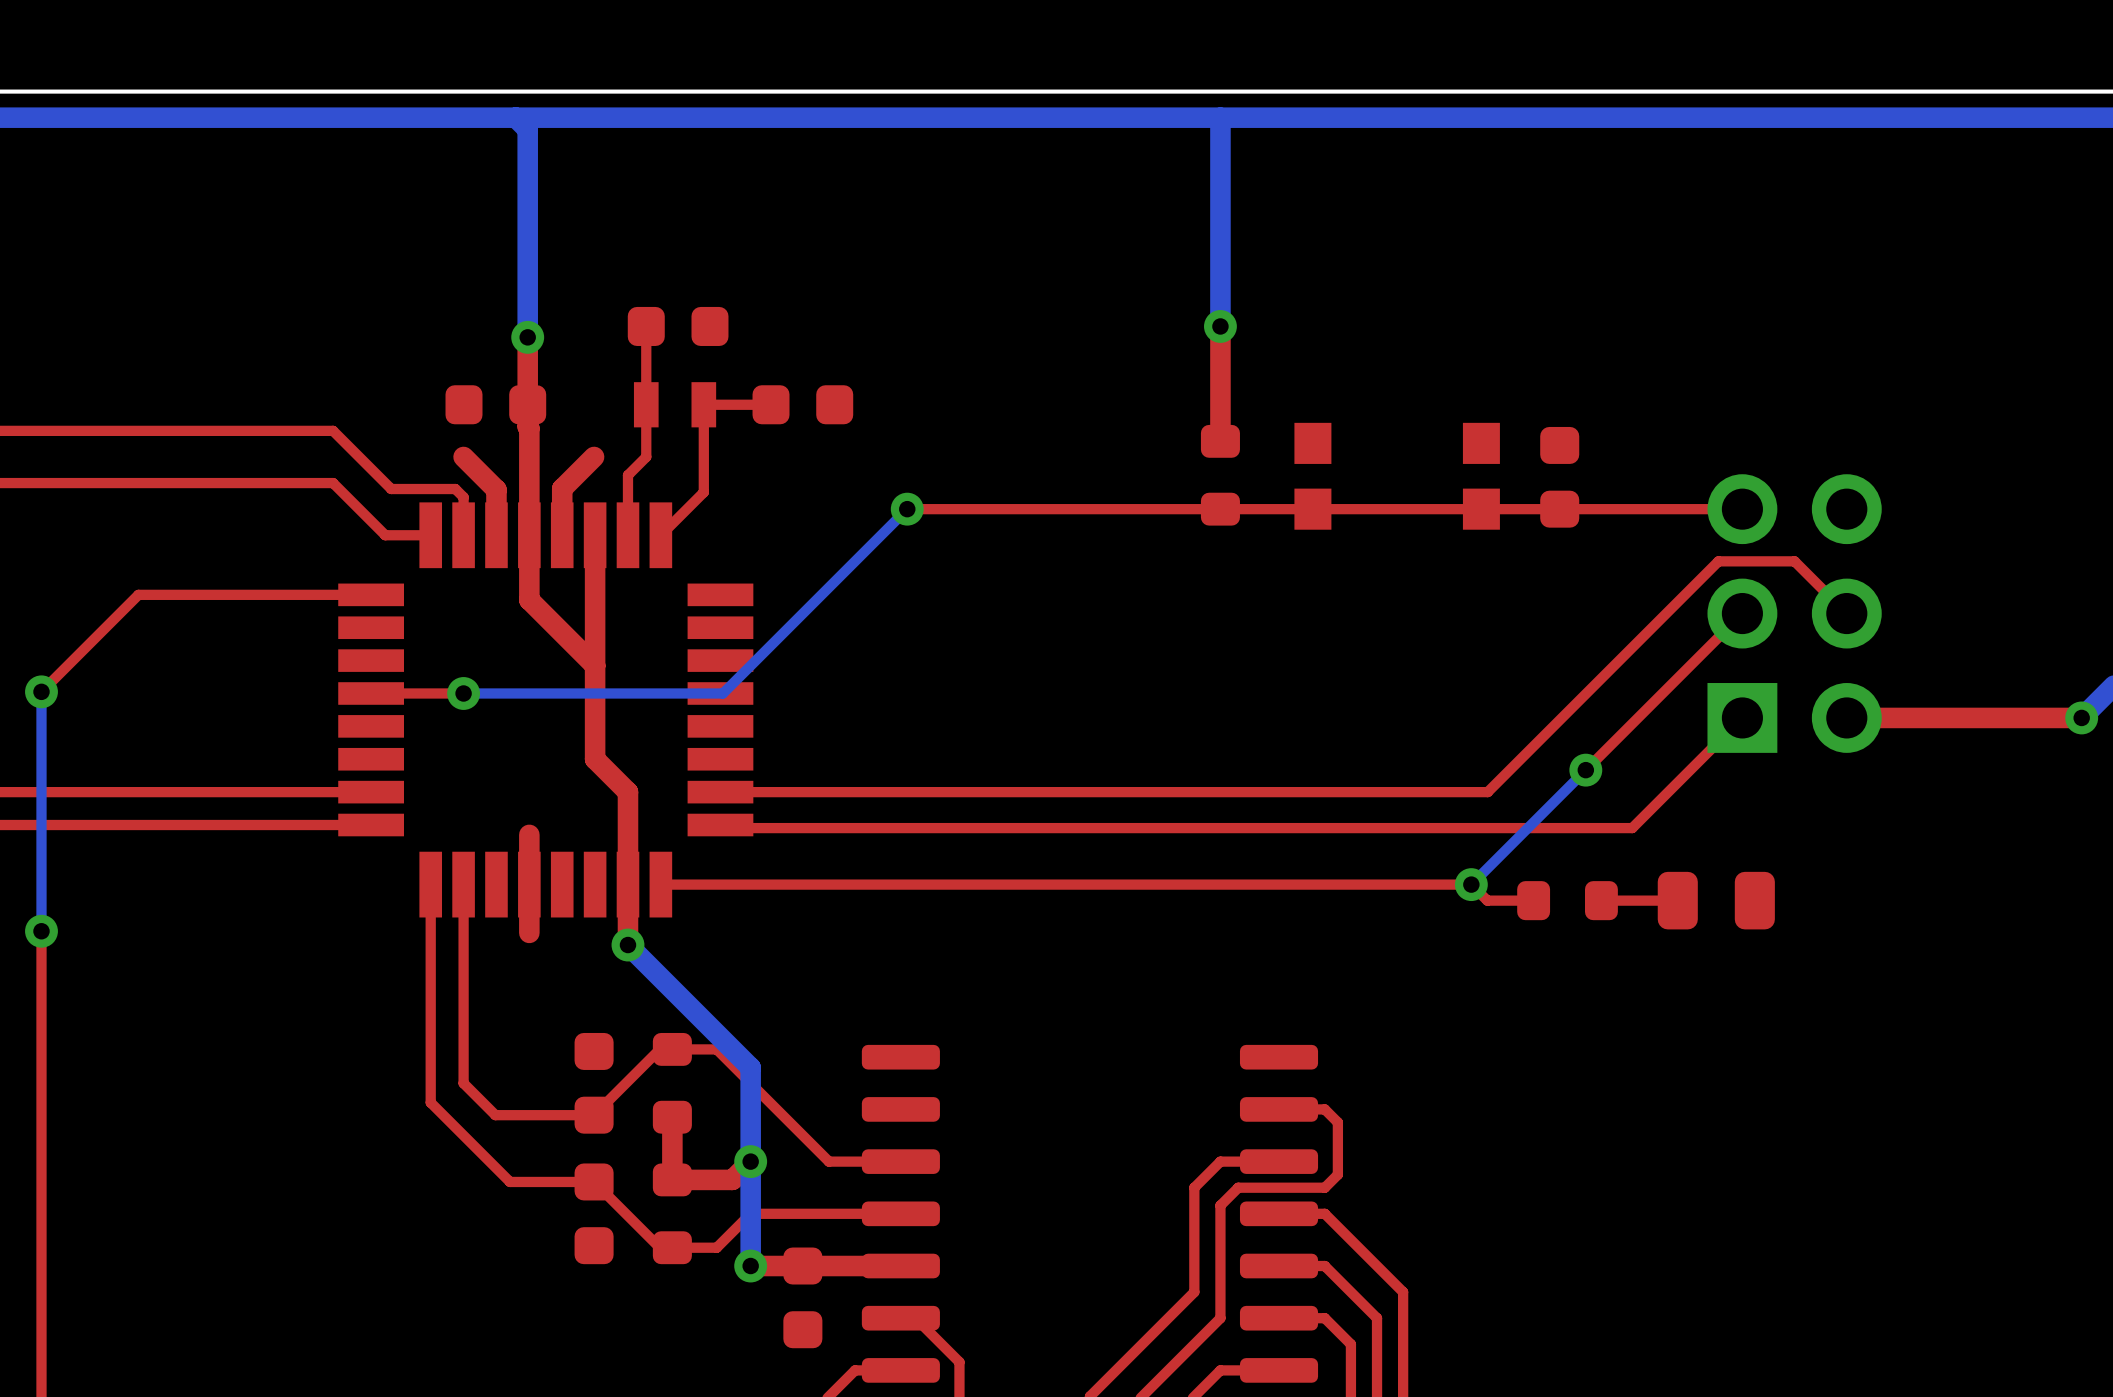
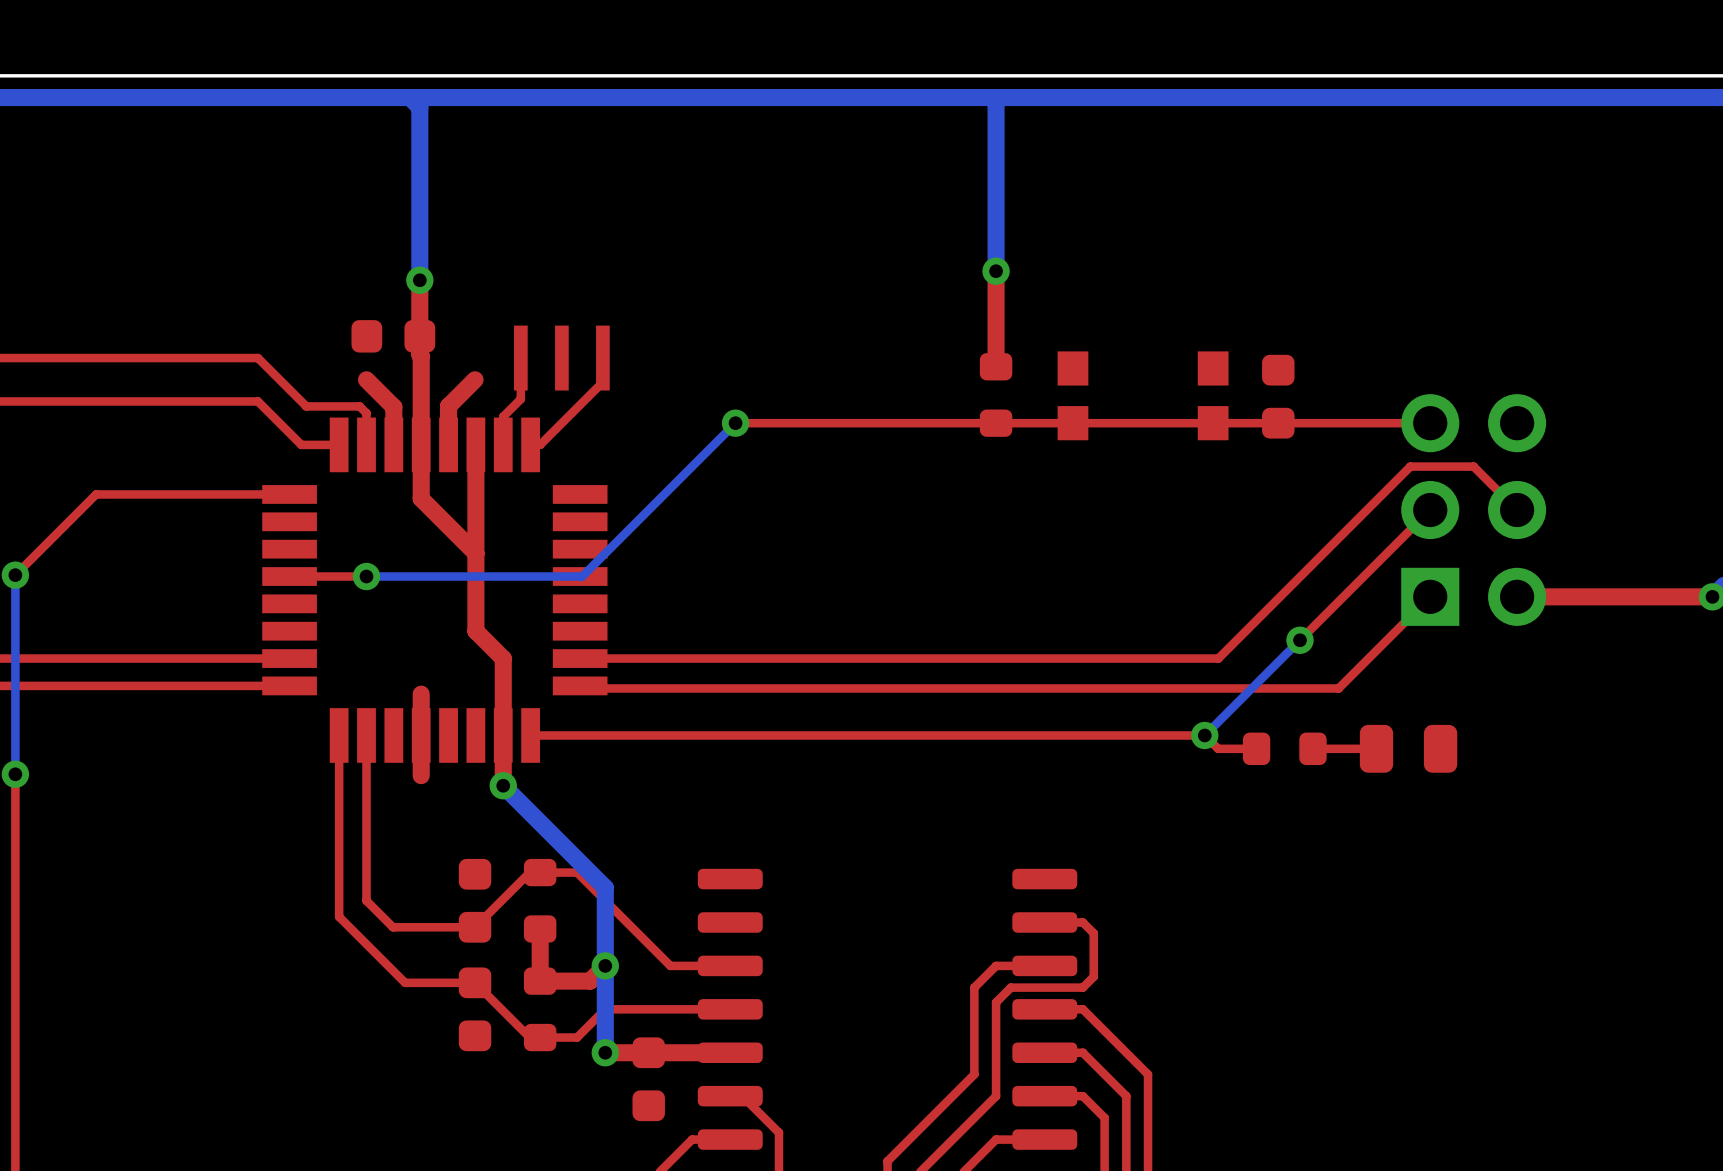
top track: (646, 326) (646, 456) (627, 475) (627, 501) -> (520, 358) (520, 399) (503, 416)
part: (678, 326) -> none
part footprint: [633, 382, 717, 428] -> [514, 325, 610, 391]
top track: (771, 404) (703, 404) (703, 492) (660, 535) -> (602, 358) (602, 382) (540, 444) (530, 444)
part: (802, 404) -> none

